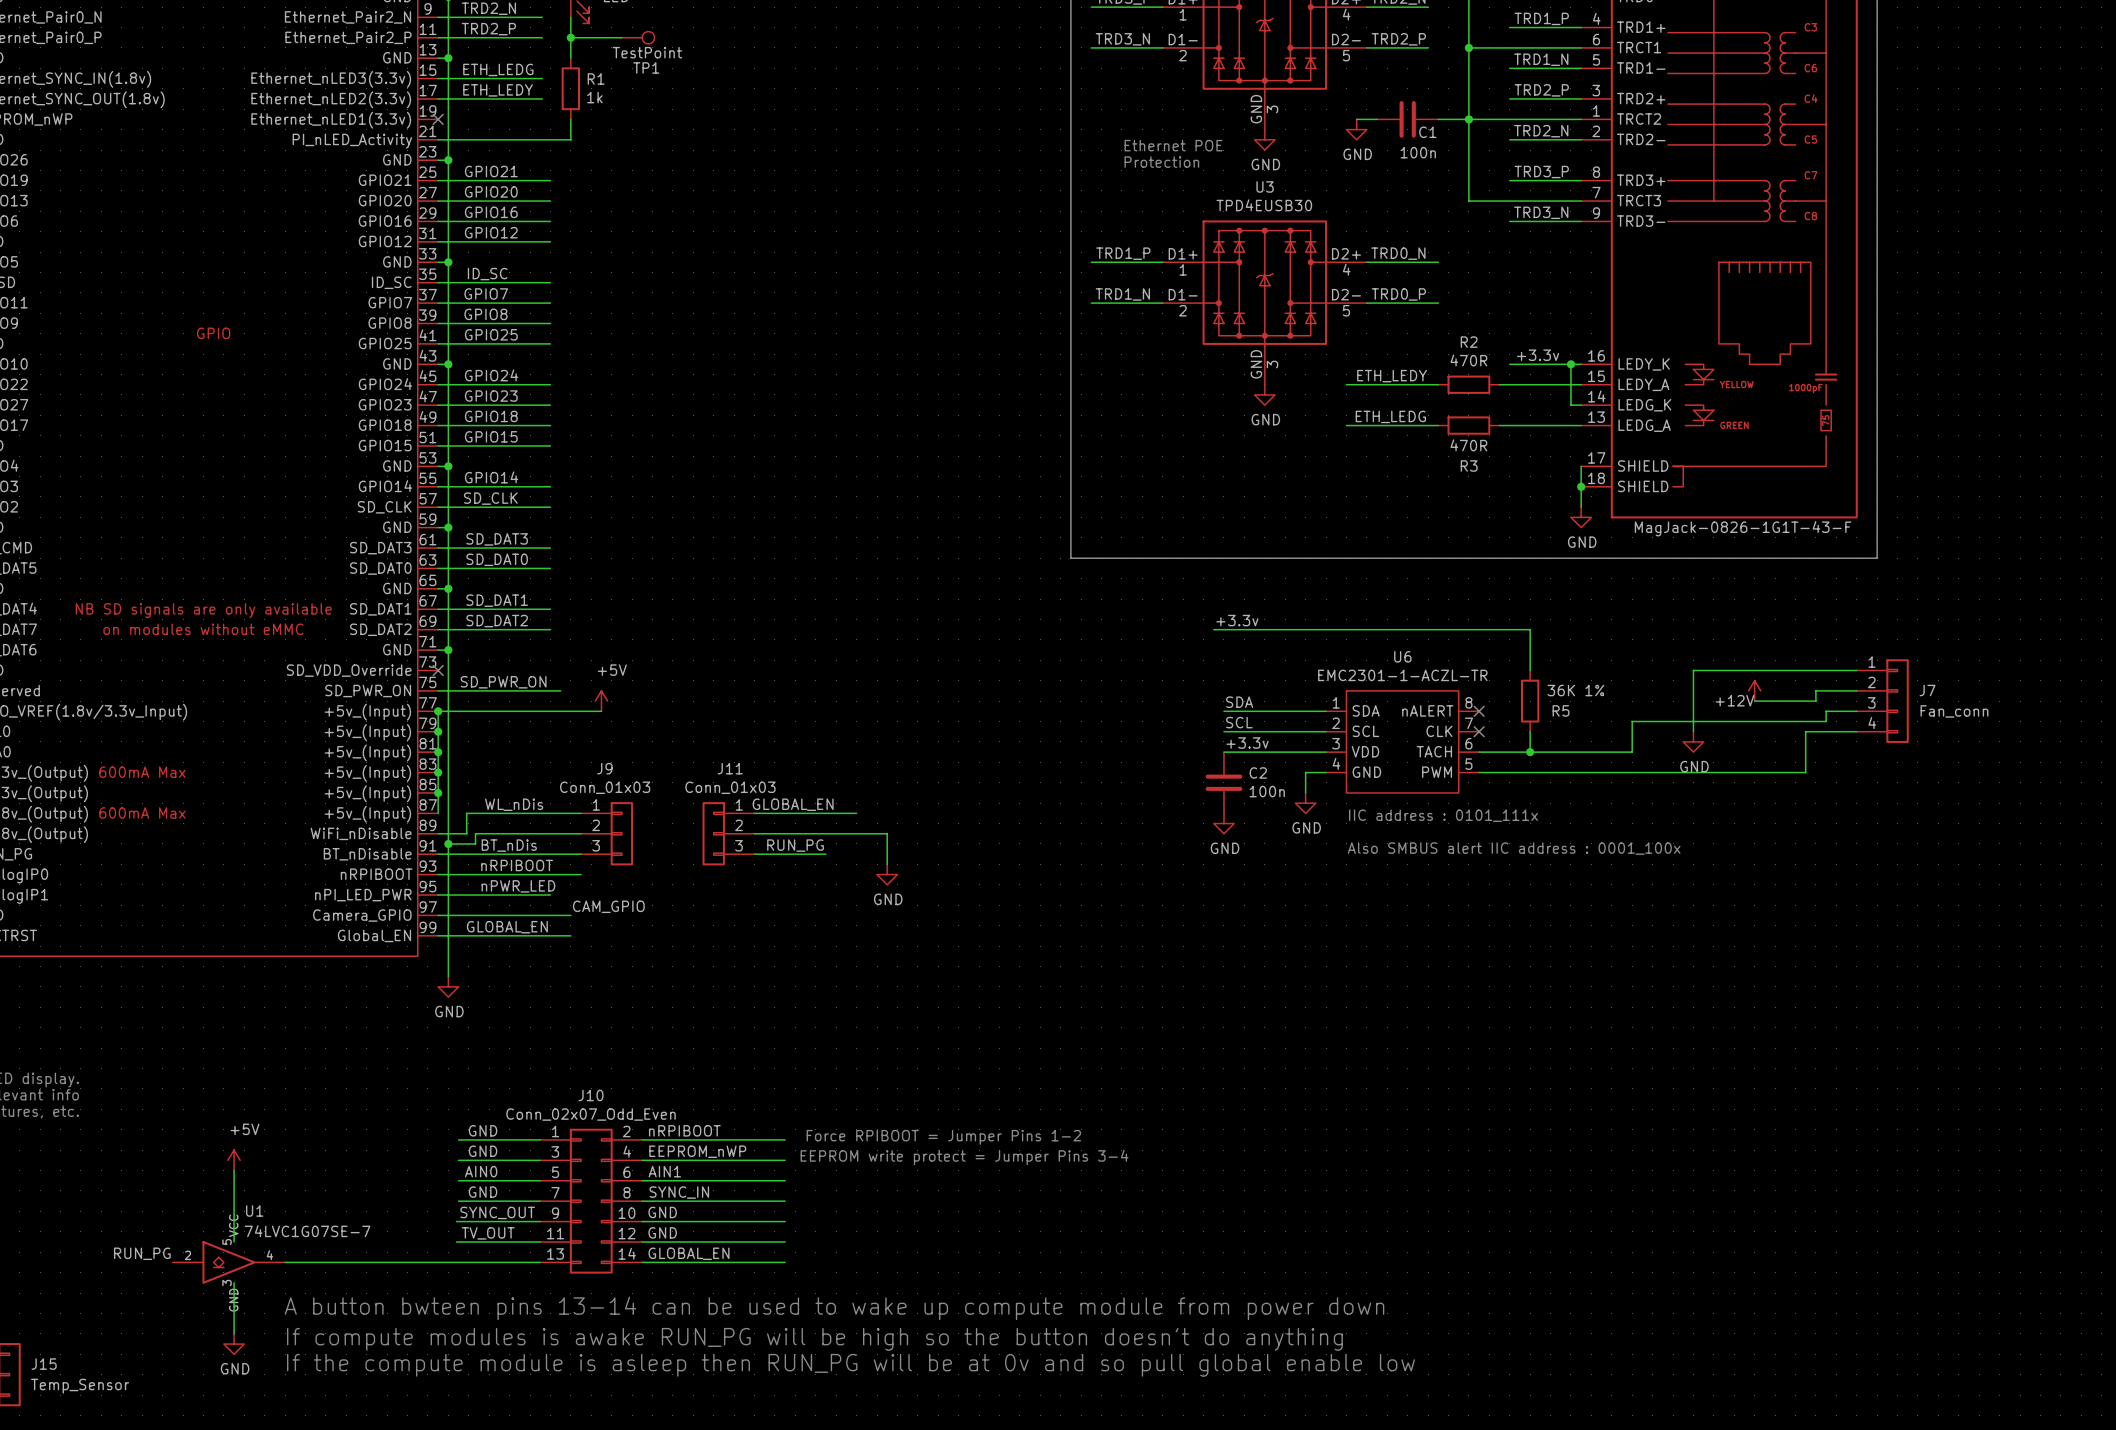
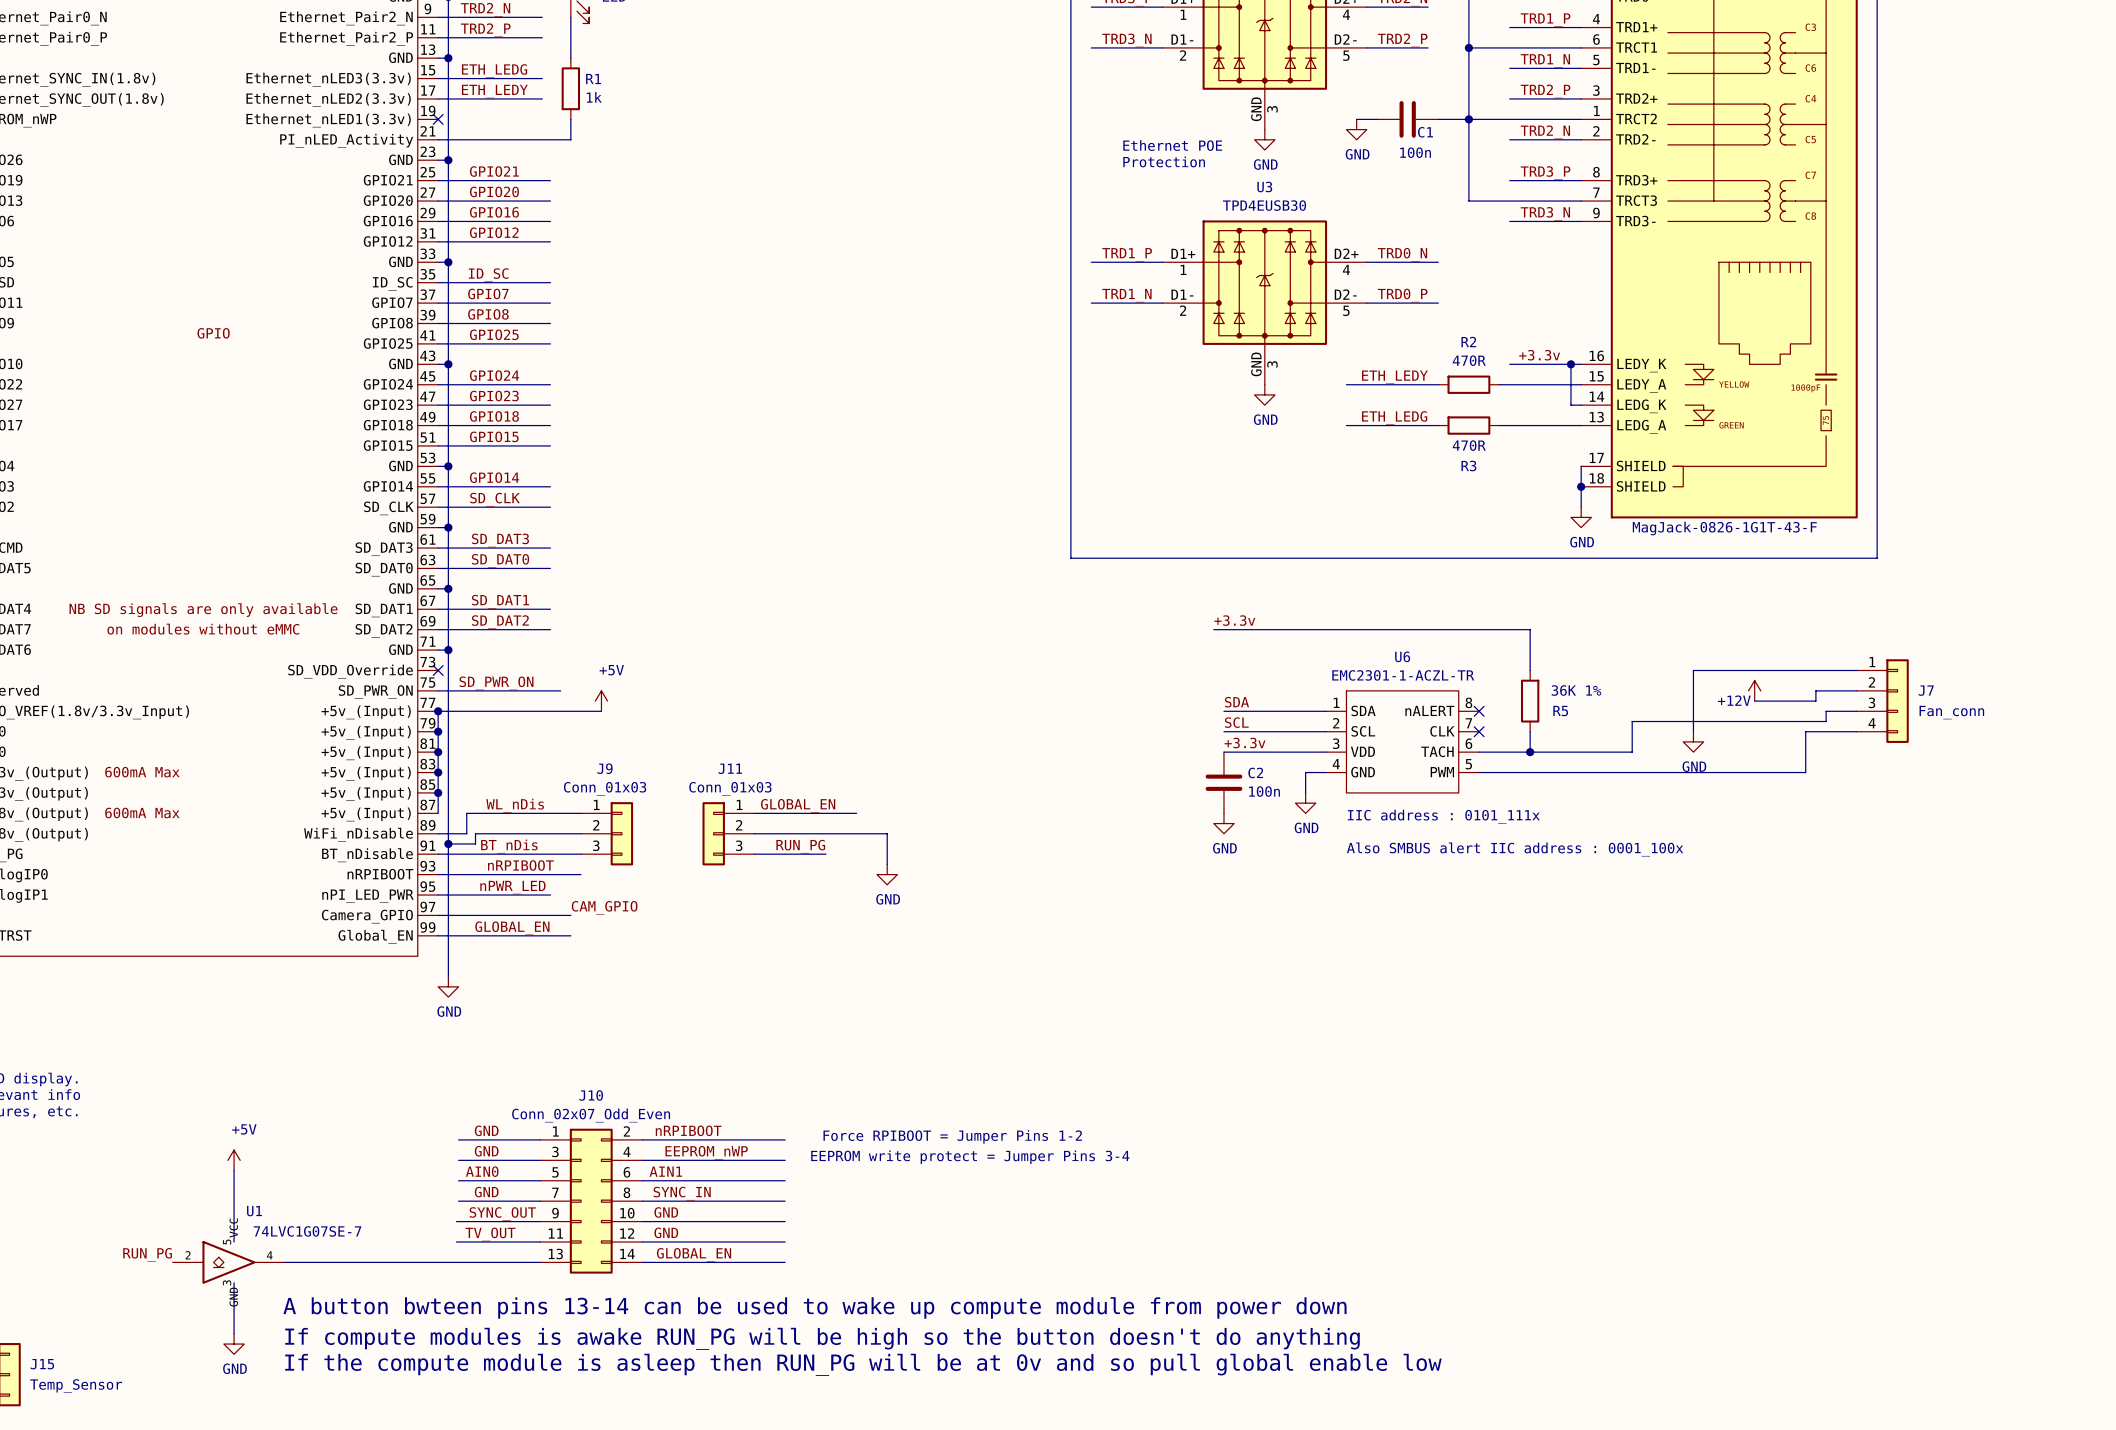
wire: (570, 37) (621, 37) -> none
junction: (570, 37) -> none
TP1: TestPoint (638, 37) -> none

